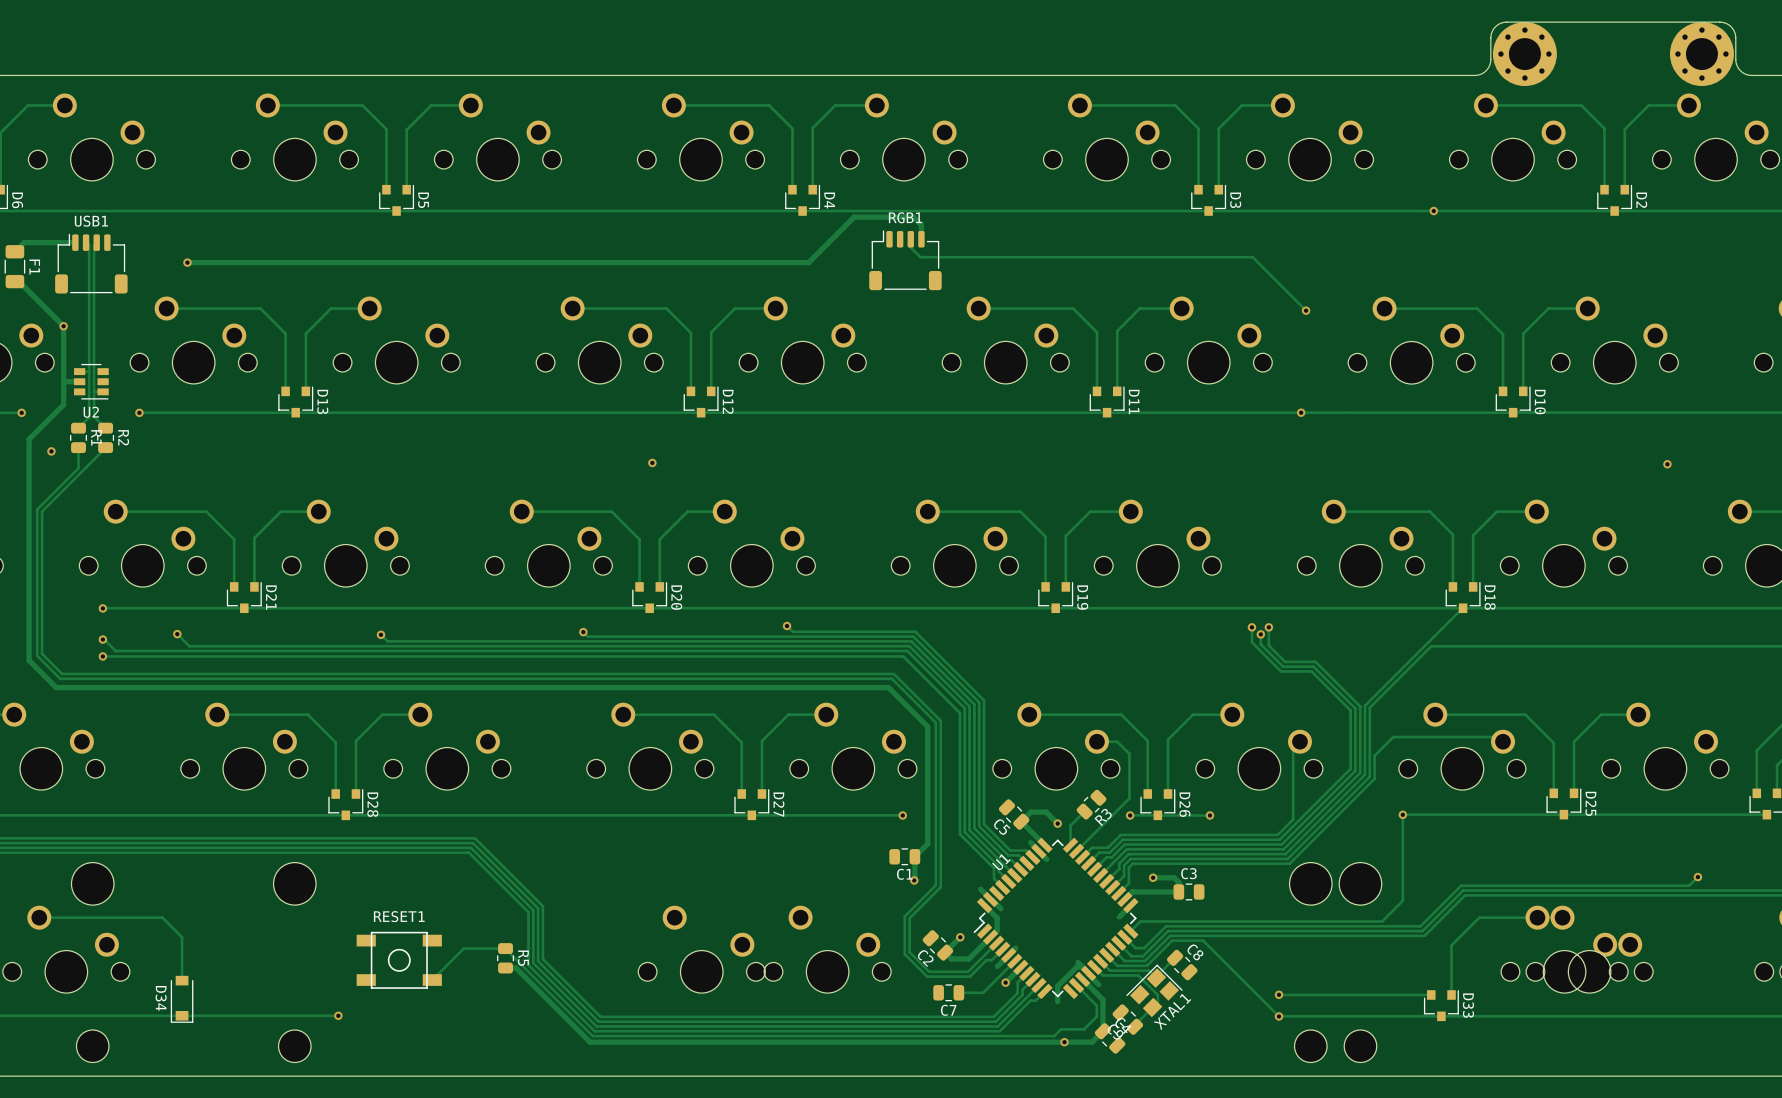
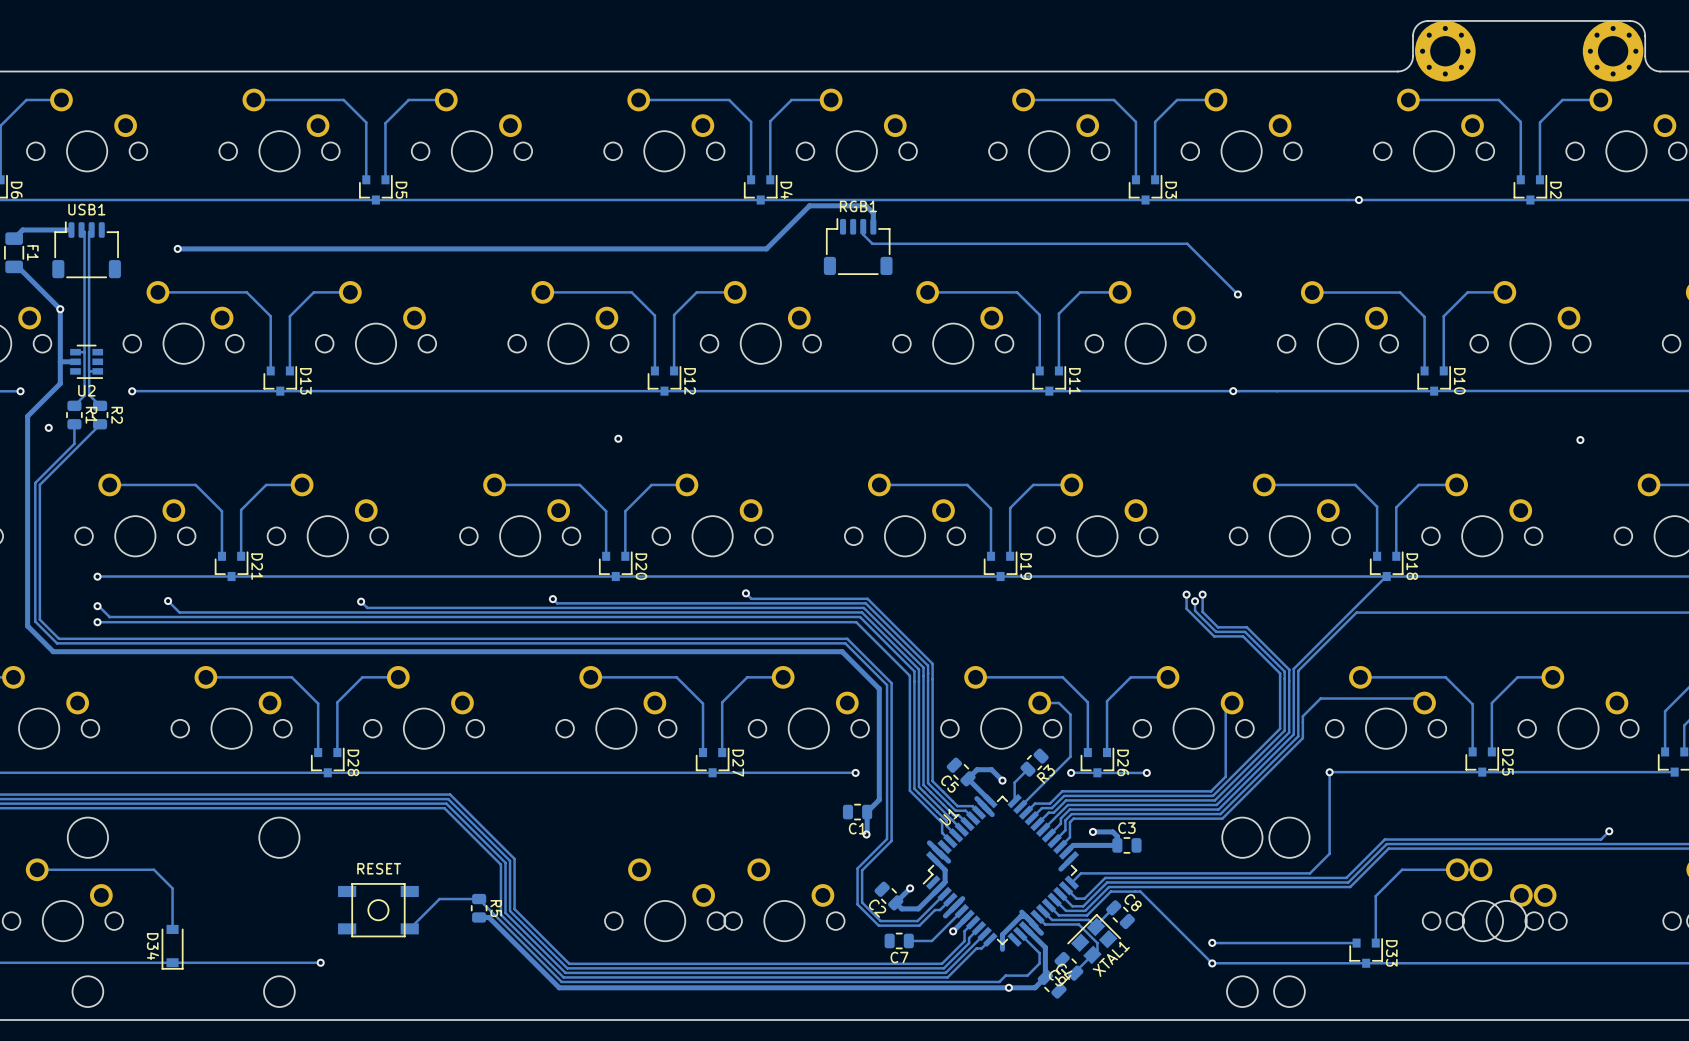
RESET1 name: RESET1 (399, 916) -> RESET (379, 868)

